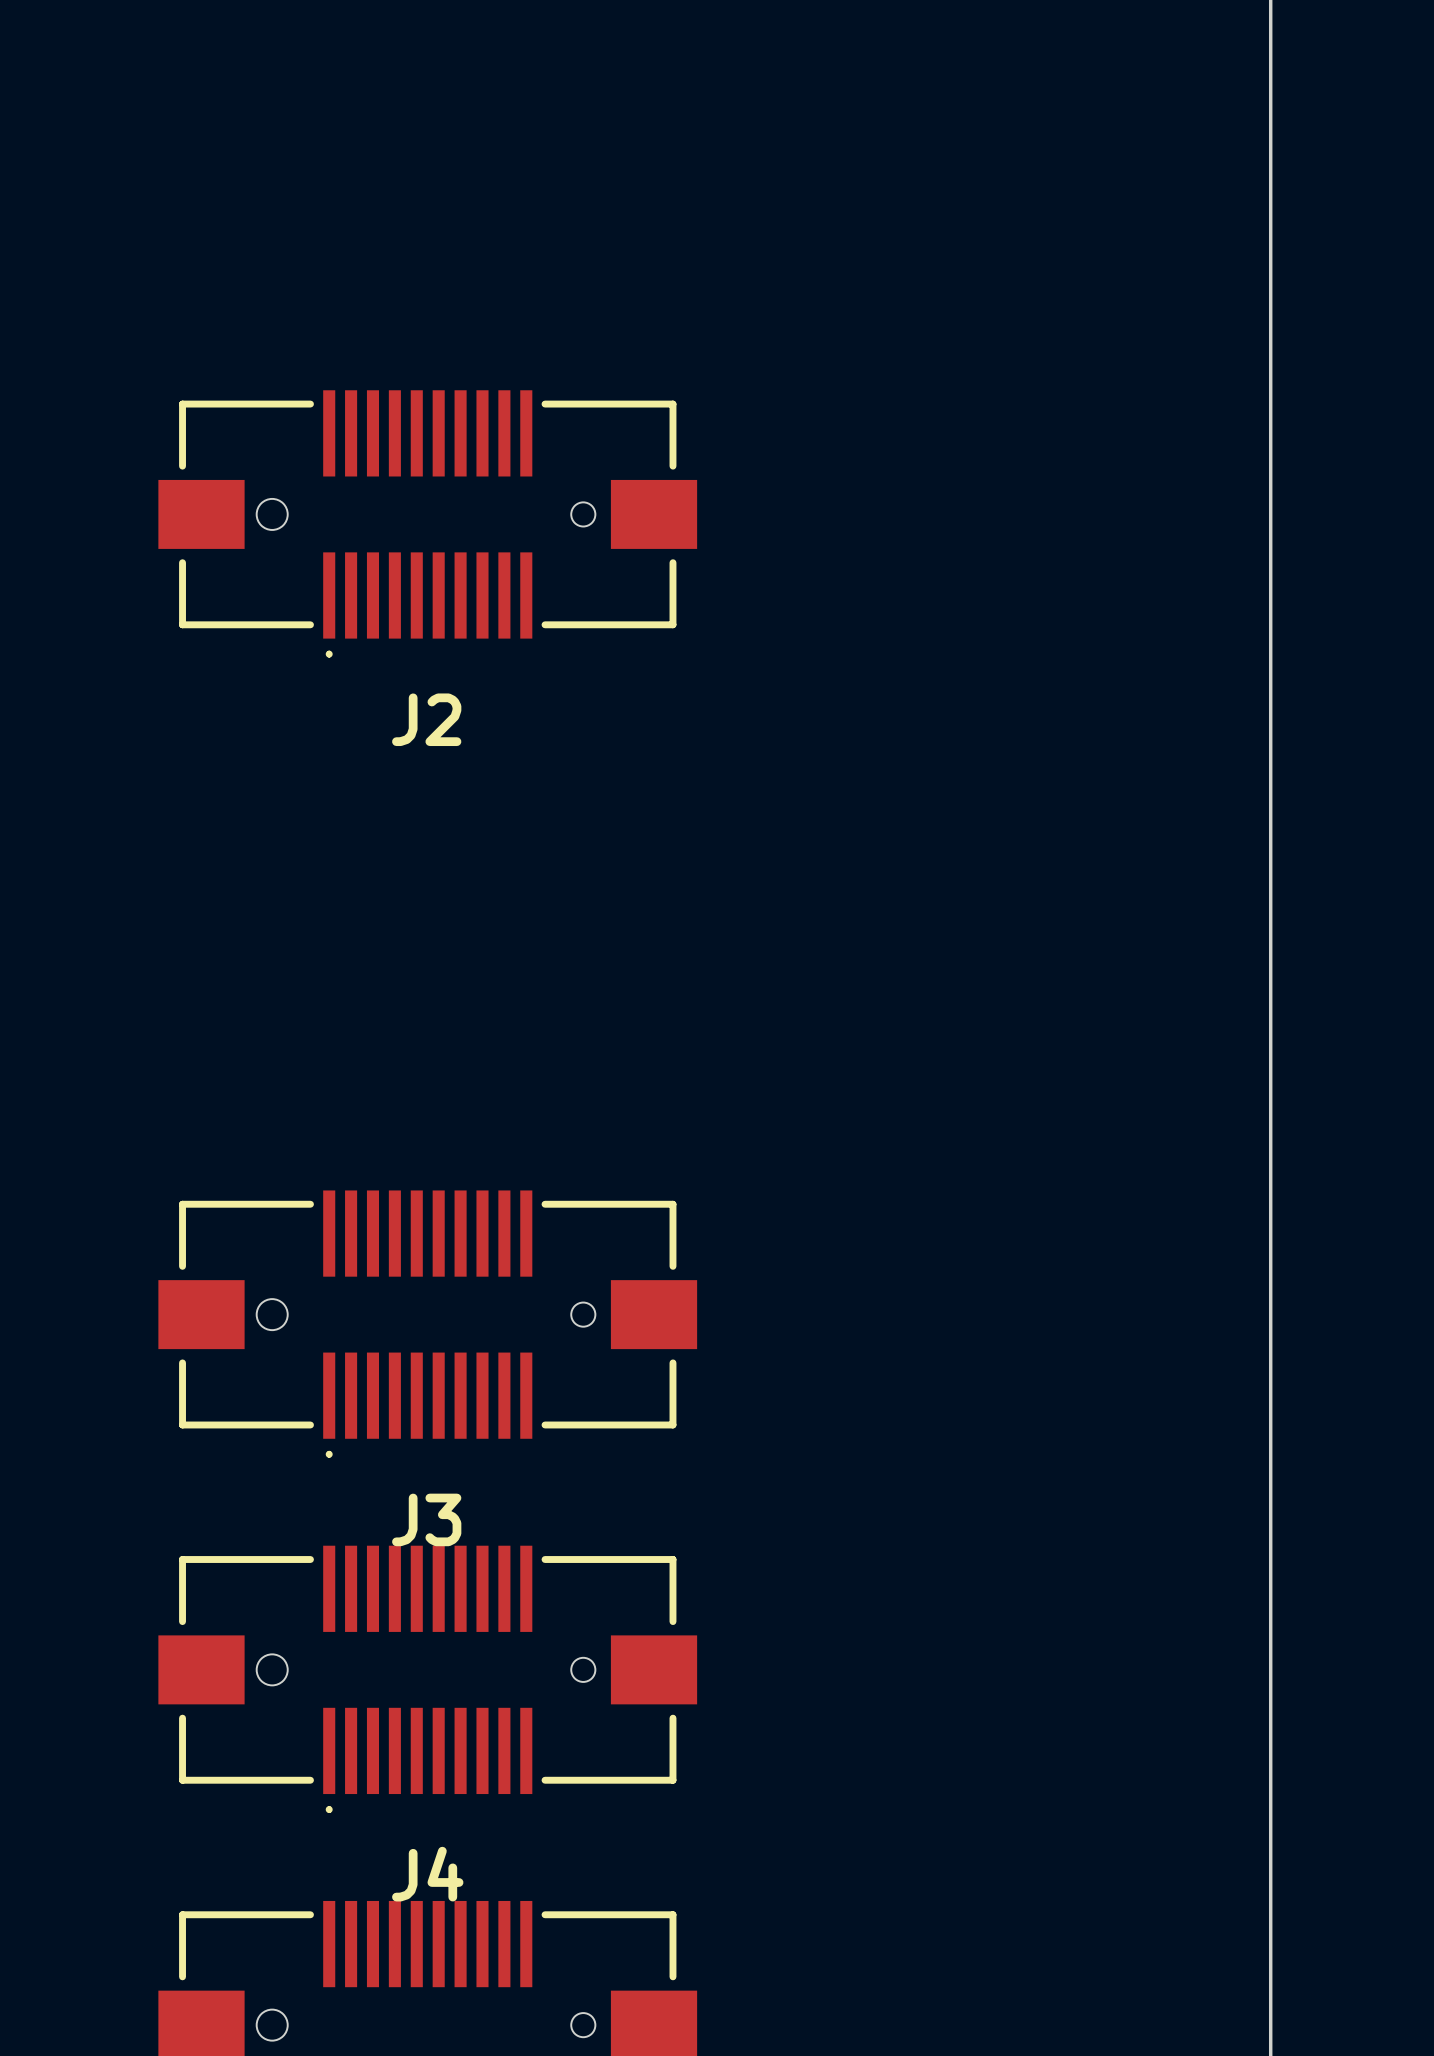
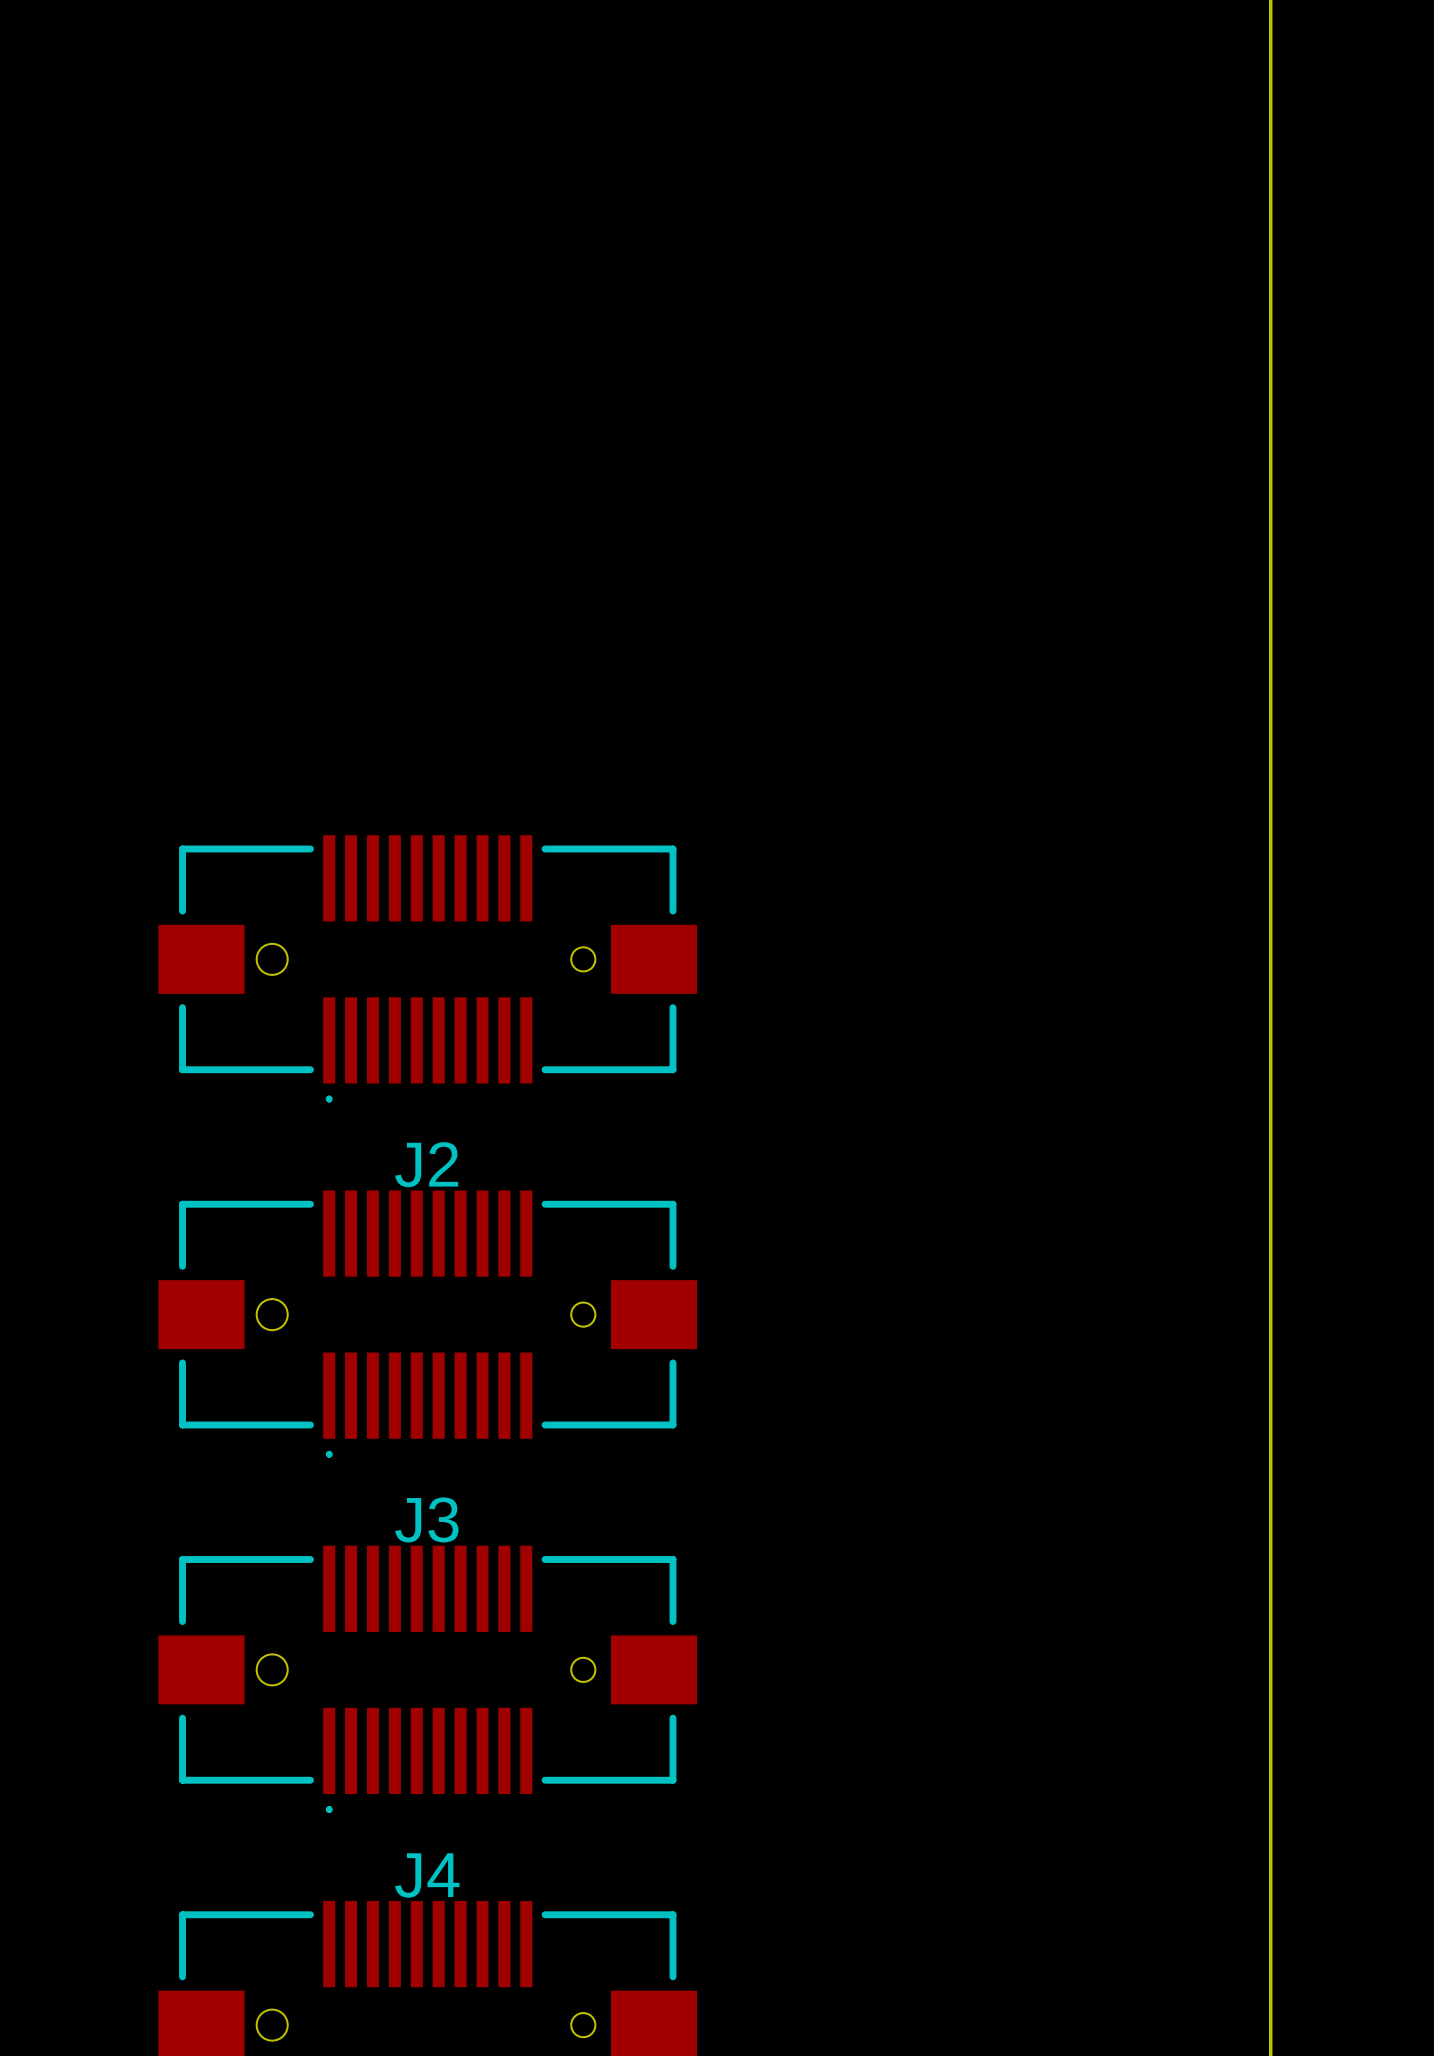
J2 position: (427, 523) -> (427, 968)

